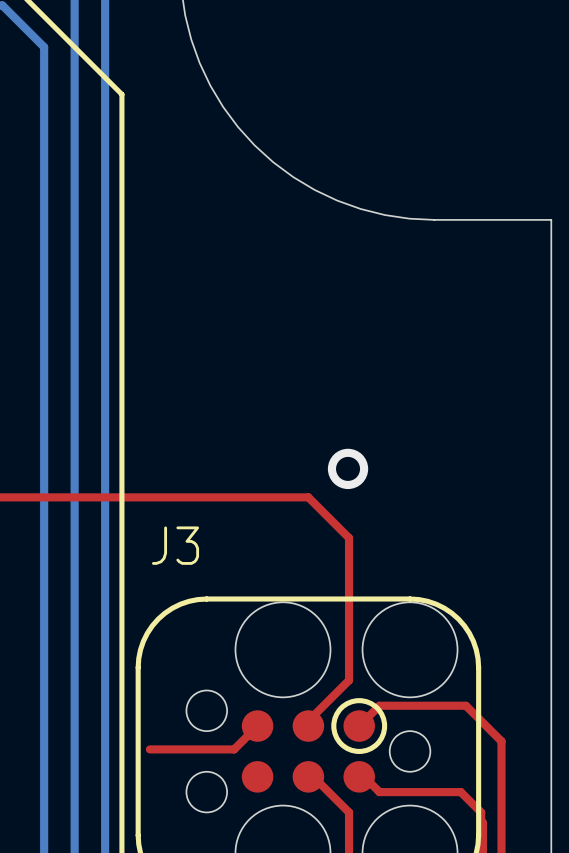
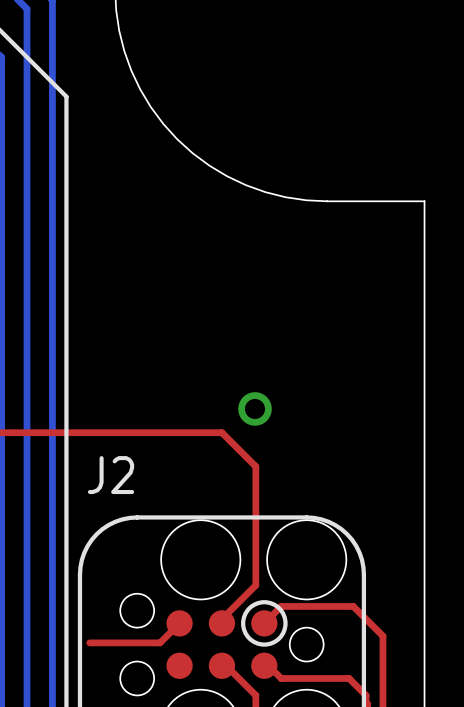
J3 name: J3 (175, 545) -> J2 (111, 475)

